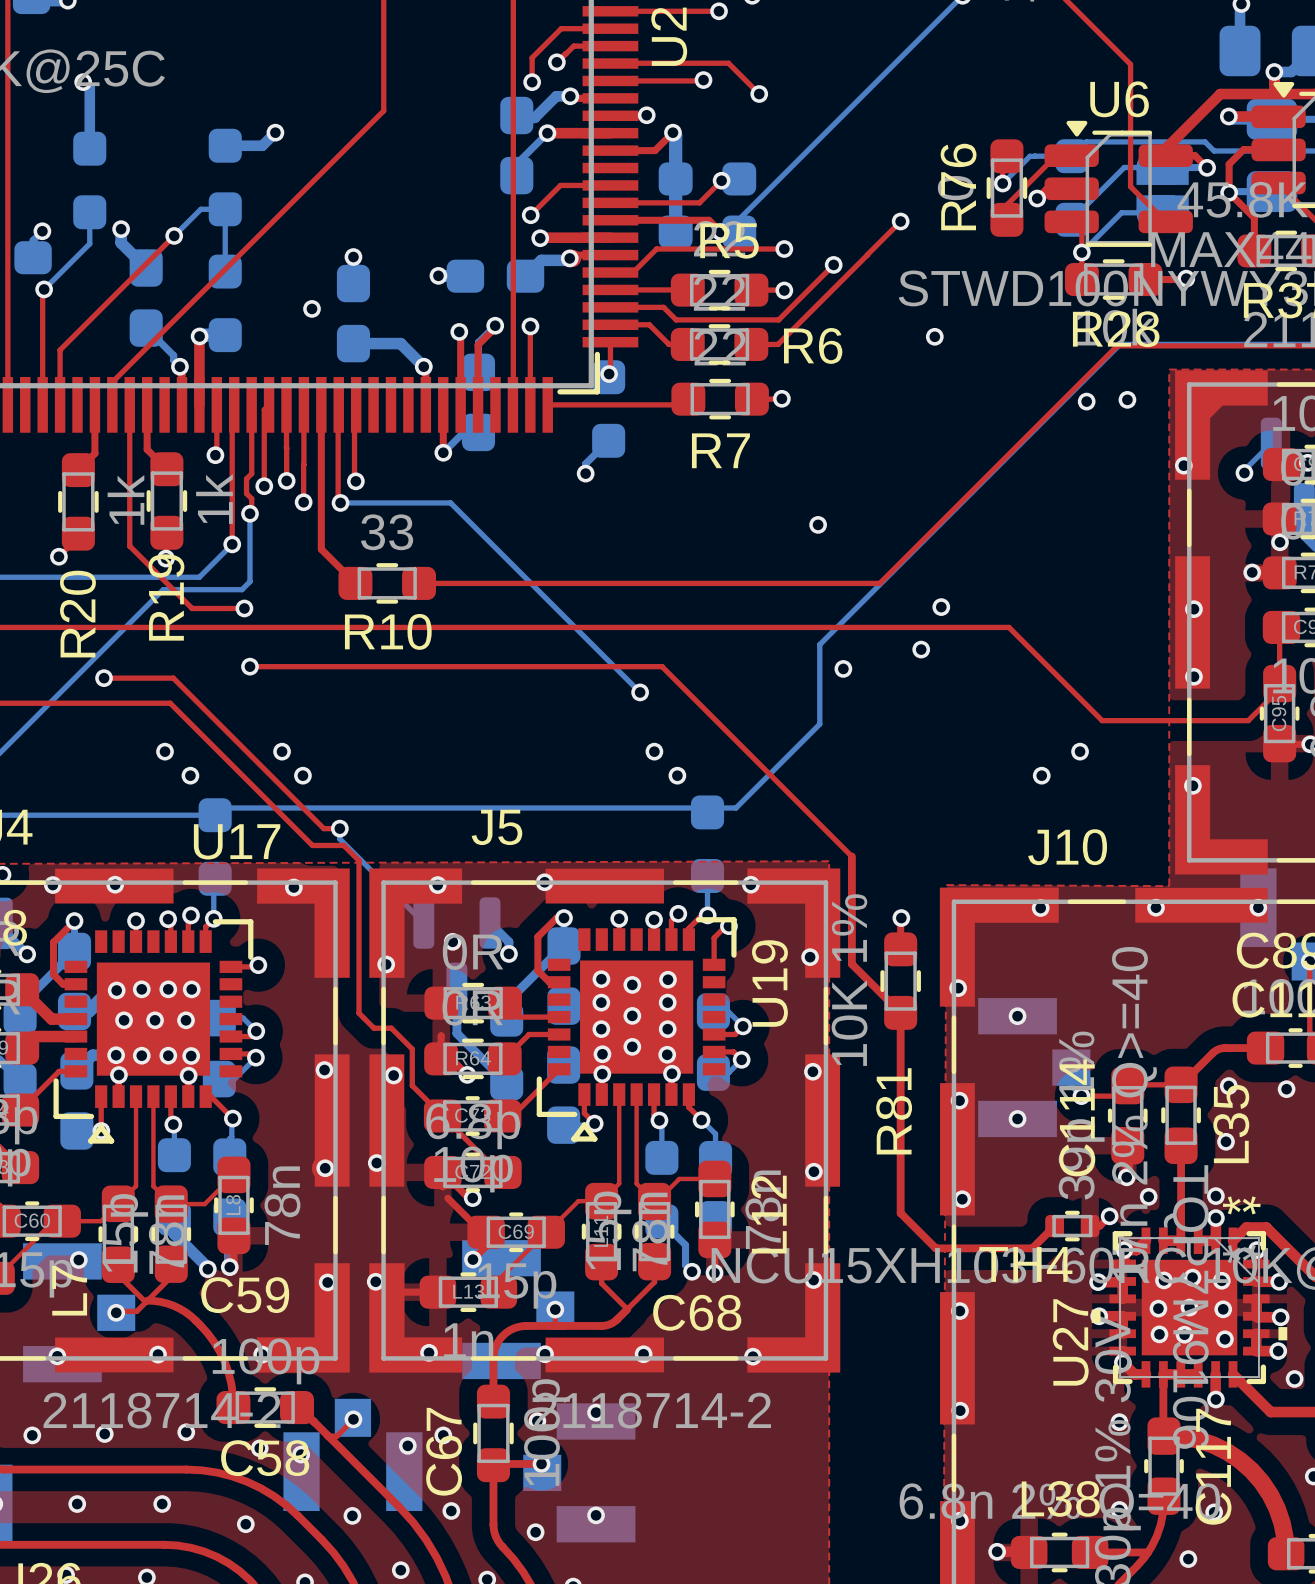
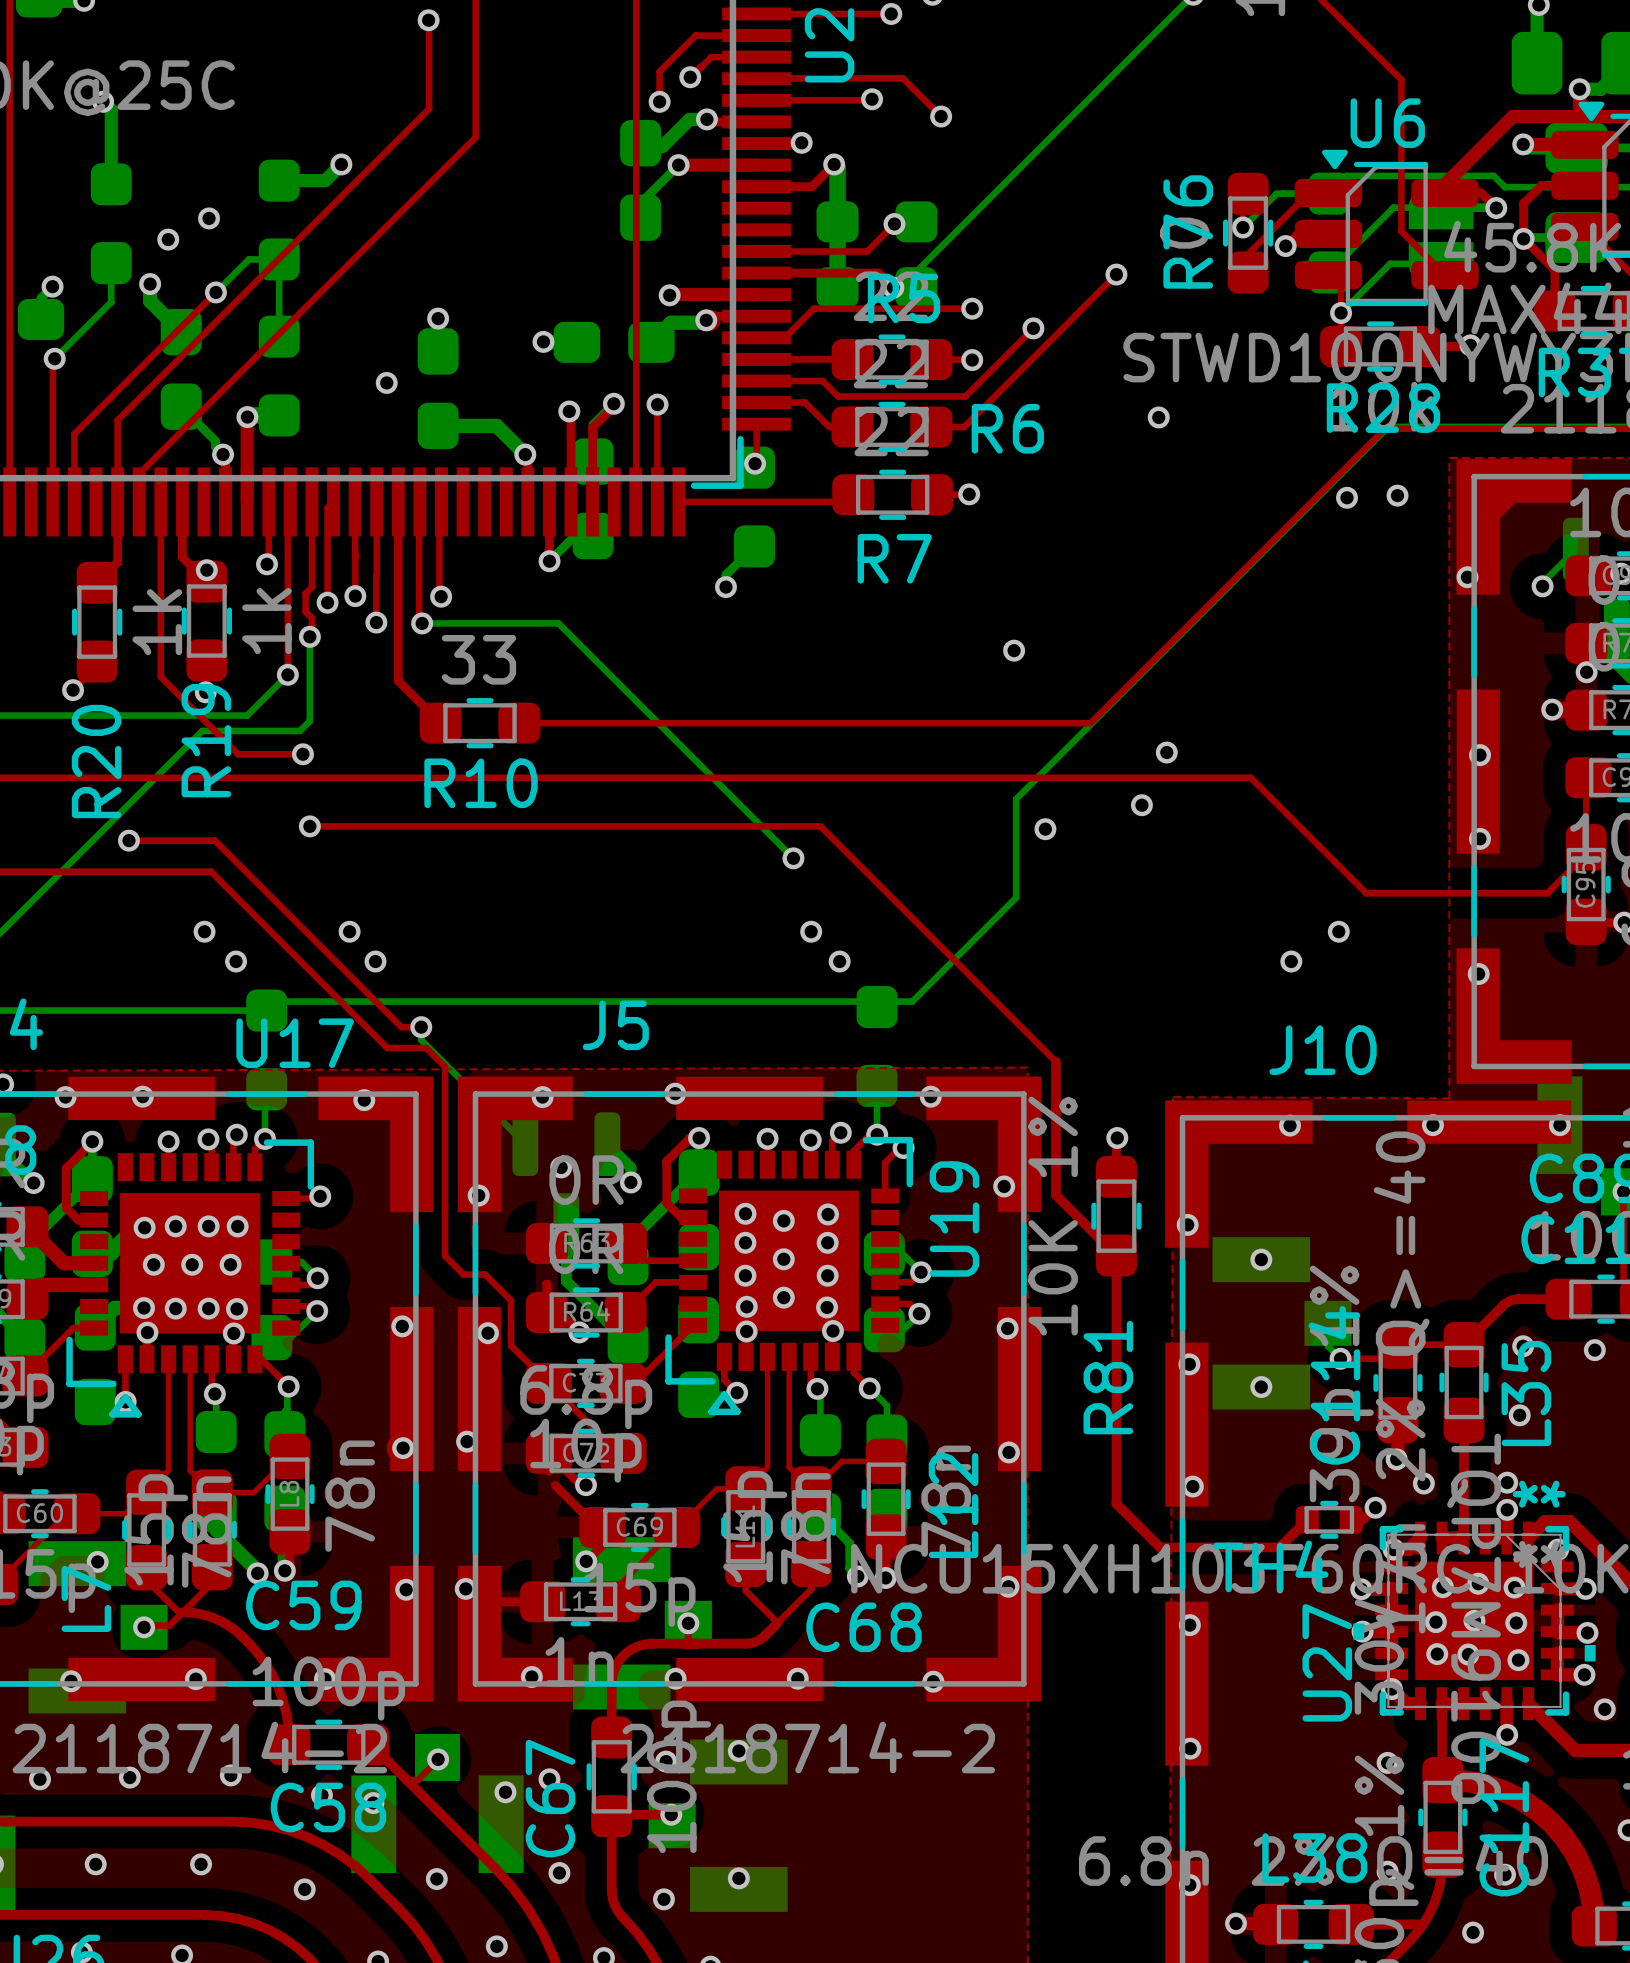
via: none -> (428, 20)
top track: none -> (429, 20) (429, 108) (117, 420) (117, 501)
via: none -> (209, 218)
top track: (610, 185) (560, 185) (530, 215) -> none
via: none -> (168, 239)
via: (530, 215) -> none
via: none -> (206, 570)

